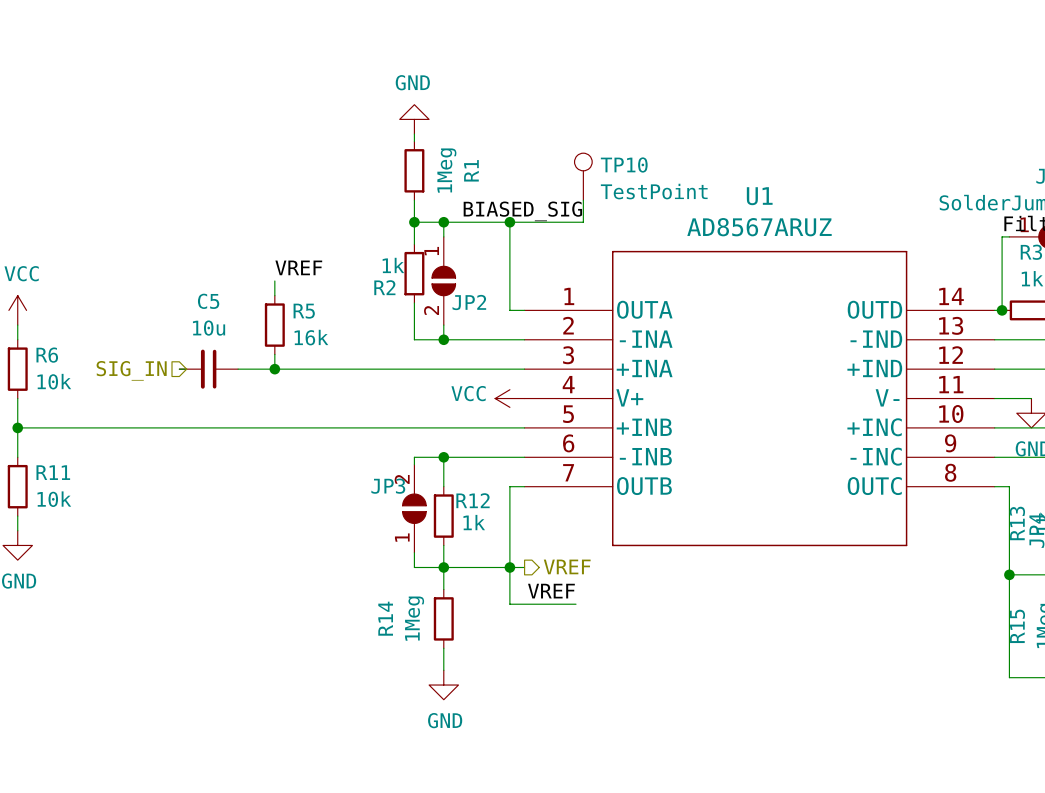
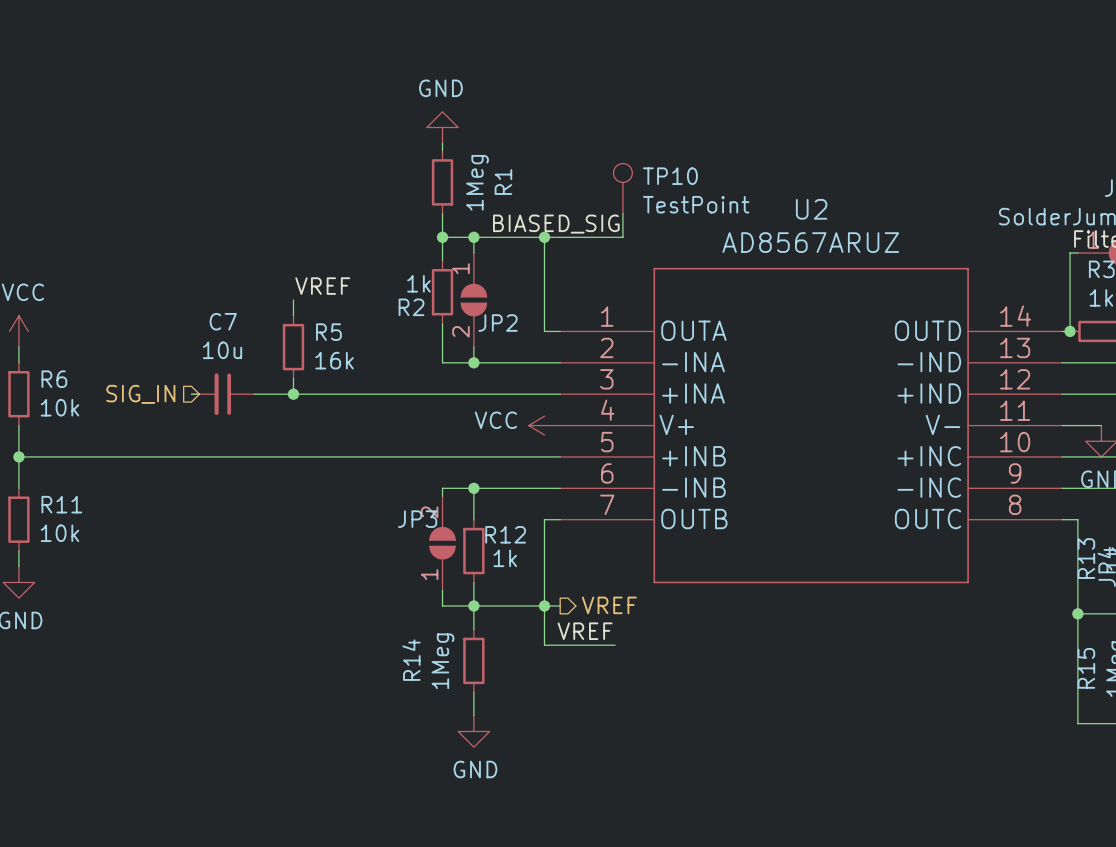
U1 name: U1 (759, 196) -> U2 (811, 209)
C5 name: C5 (208, 301) -> C7 (223, 321)

